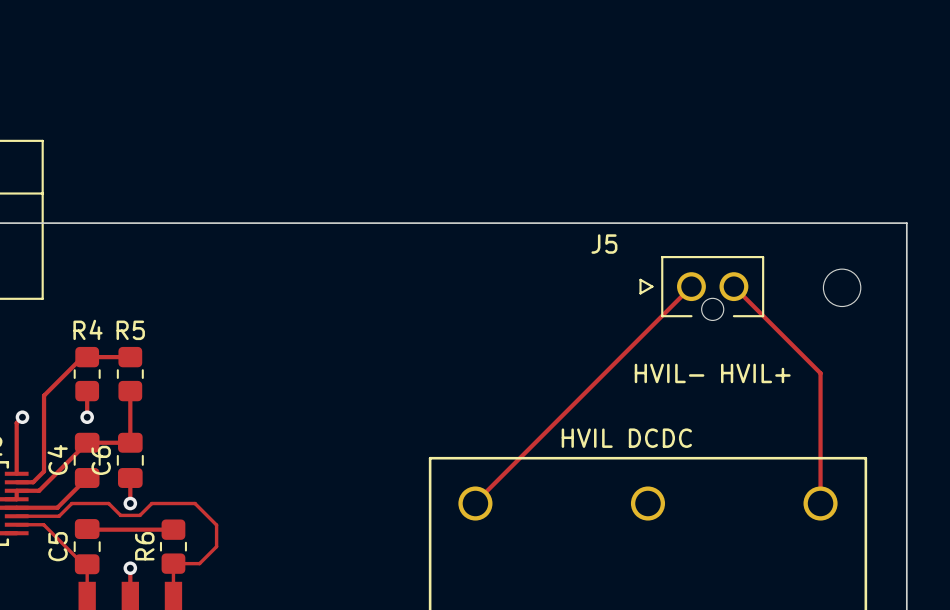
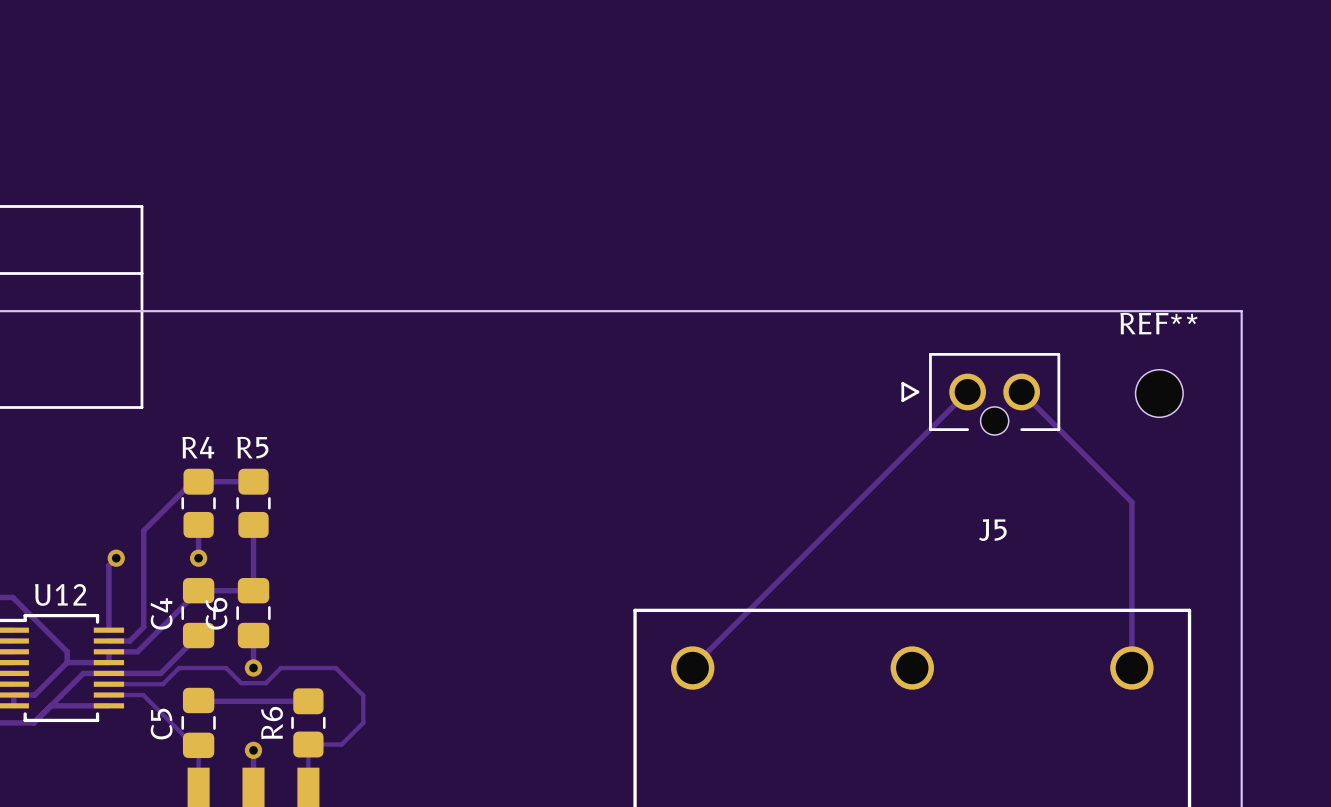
REF** name: none -> REF** (1158, 323)
J5 name position: J5 (604, 244) -> J5 (992, 530)
text: HVIL- (669, 373) -> none
text: HVIL+ (755, 373) -> none
text: HVIL DCDC (626, 438) -> none

